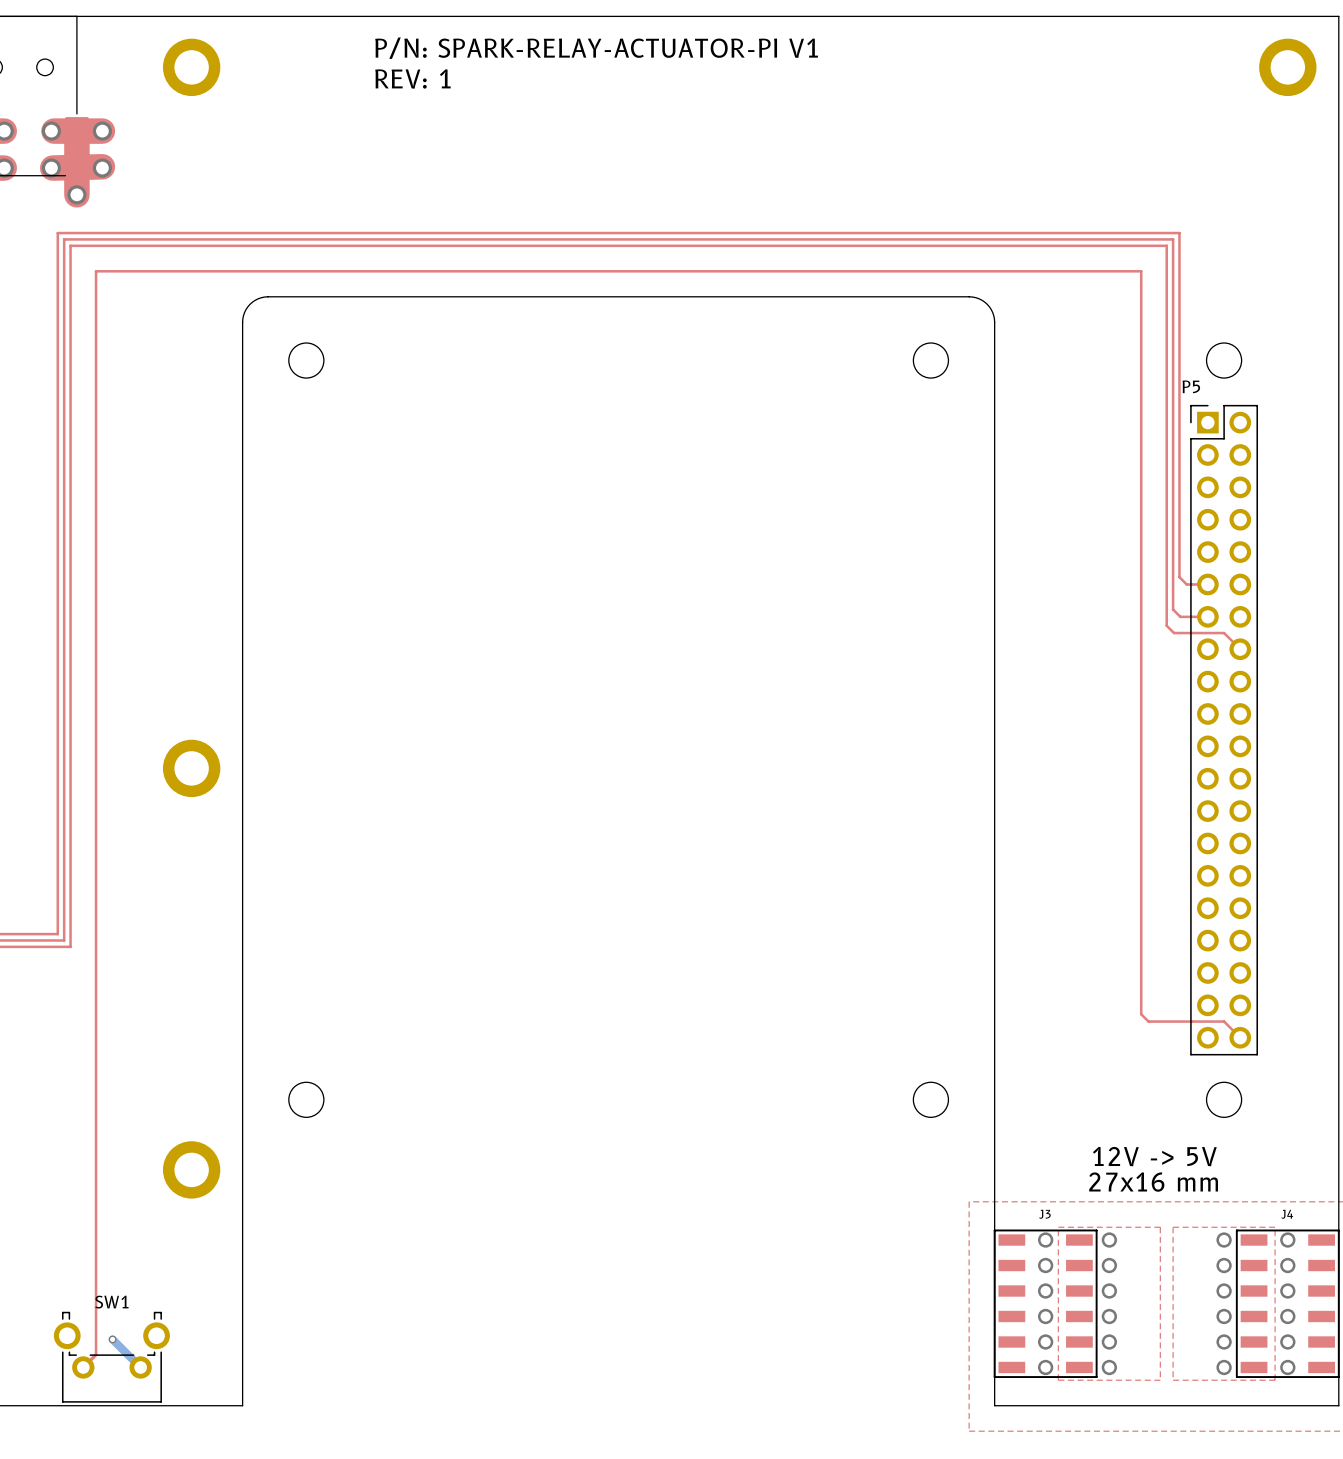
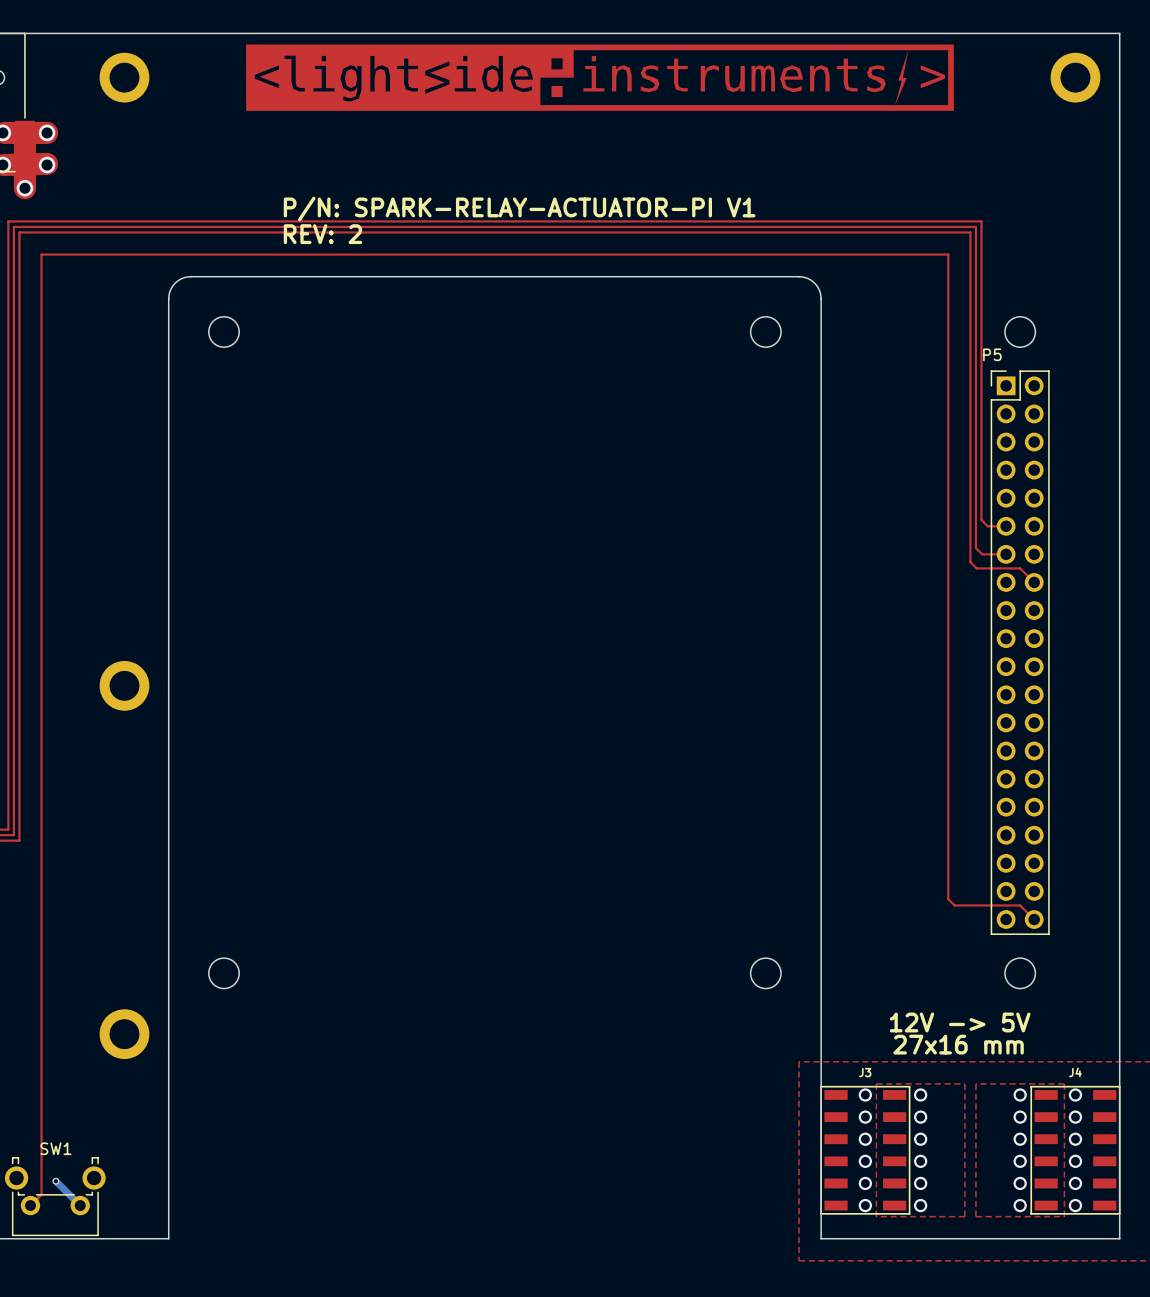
drawing: none -> [246, 44, 954, 111]
text position: P/N: SPARK-RELAY-ACTUATOR-PI V1 (596, 48) -> P/N: SPARK-RELAY-ACTUATOR-PI V1 (519, 209)
text: REV: 1 (412, 78) -> none
text: none -> REV: 2 (322, 234)

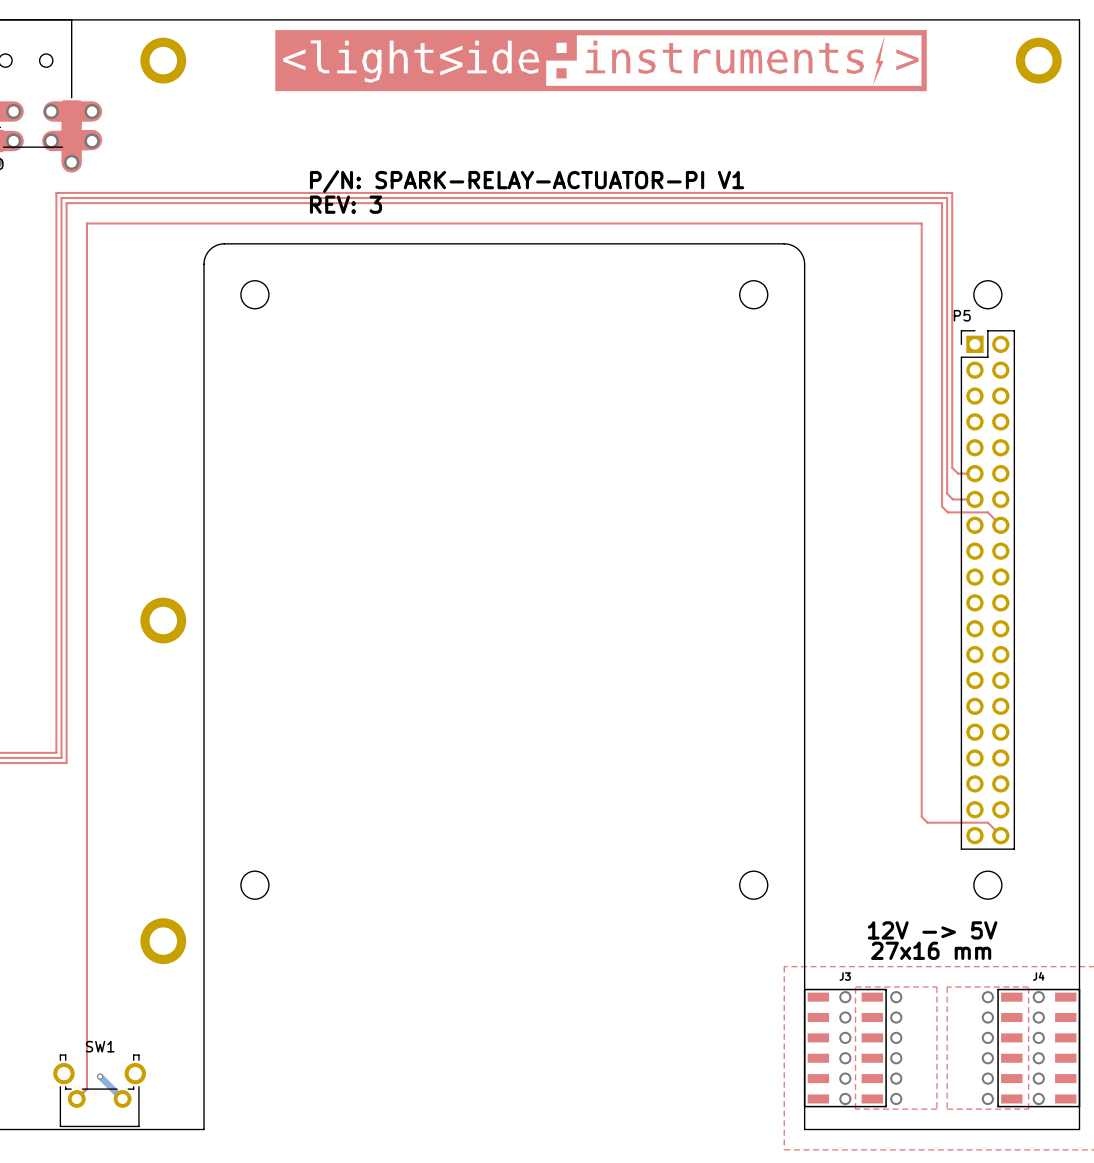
text: REV: 2 (322, 234) -> REV: 3 (346, 204)

